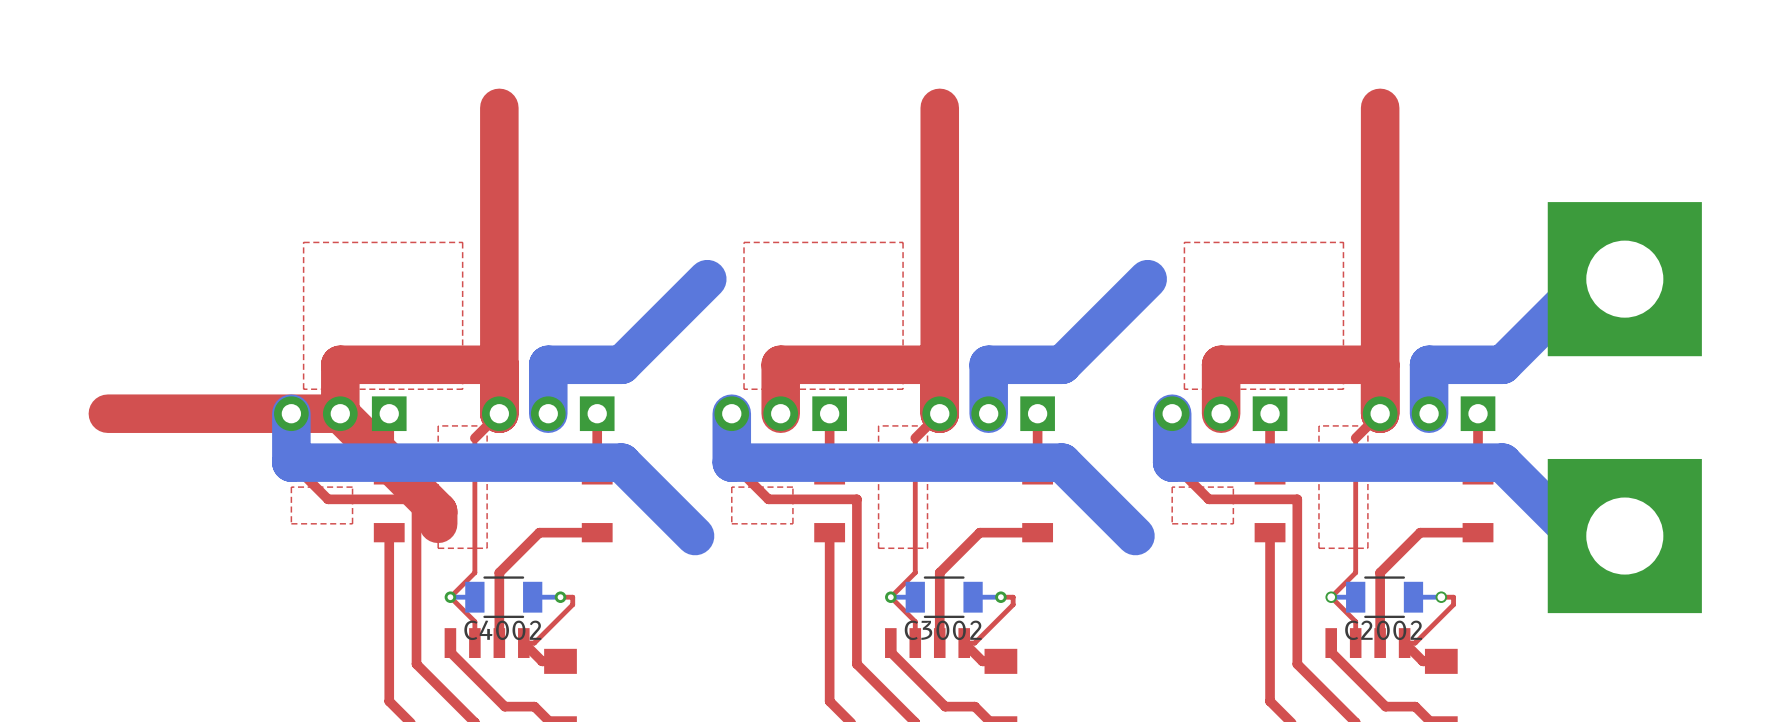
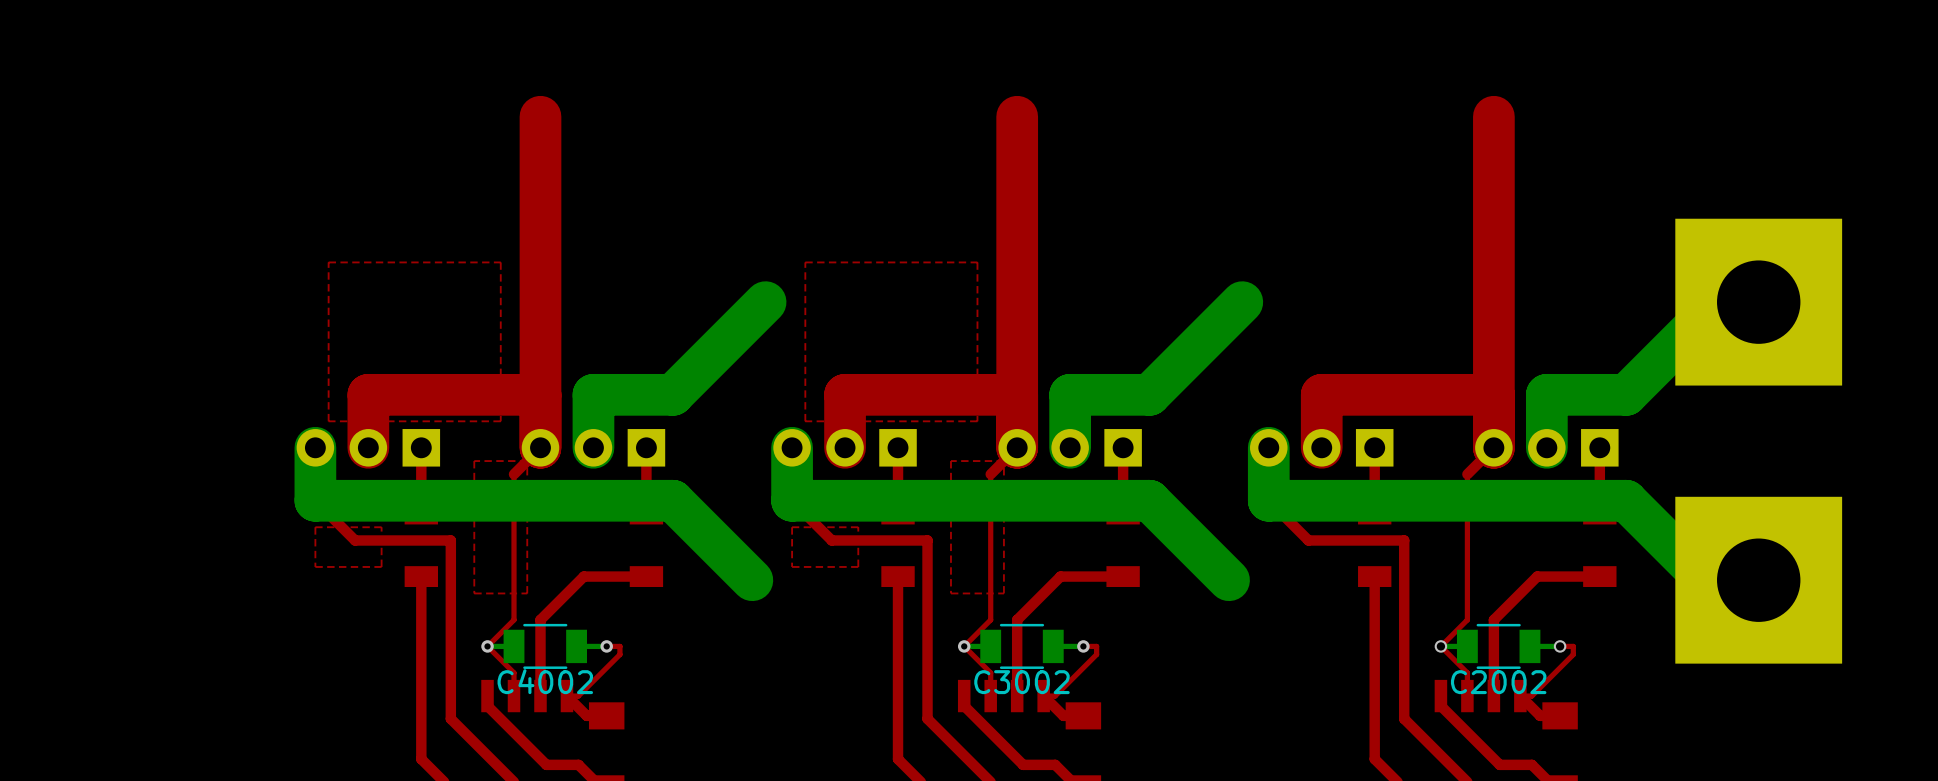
top zone outline: (1343, 242) (1343, 389) (1184, 389) (1184, 242) (1343, 242) -> none
top track: (107, 413) (340, 413) (438, 511) (438, 523) -> none
top zone outline: (1367, 425) (1318, 425) (1318, 548) (1367, 548) (1367, 425) -> none
top zone outline: (1233, 487) (1233, 523) (1172, 523) (1172, 487) (1233, 487) -> none

